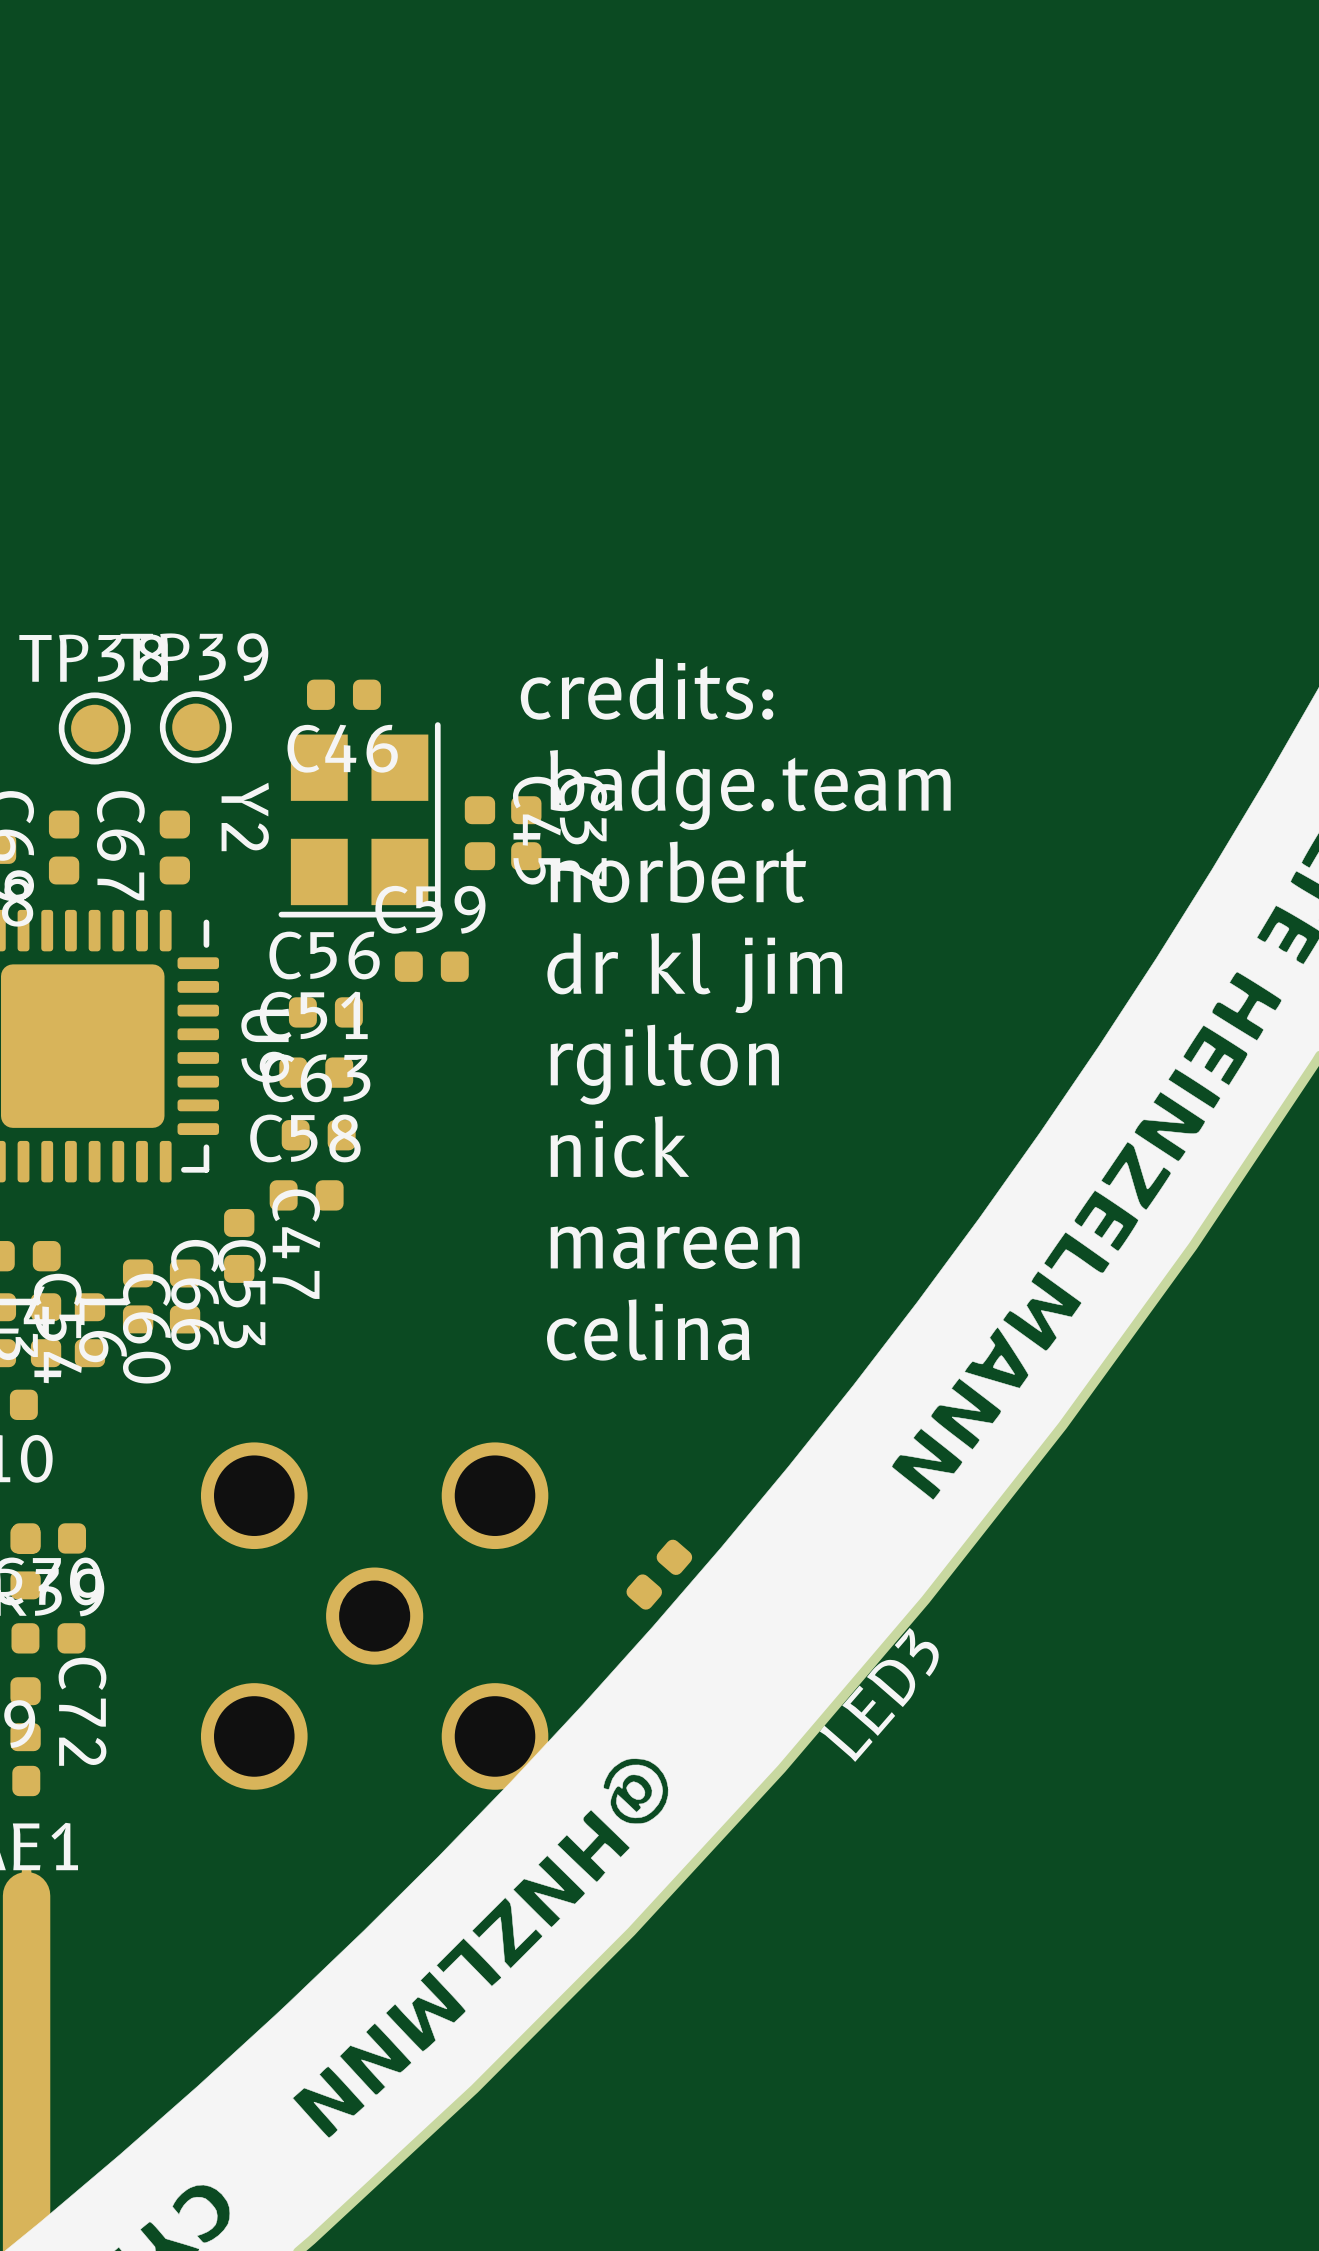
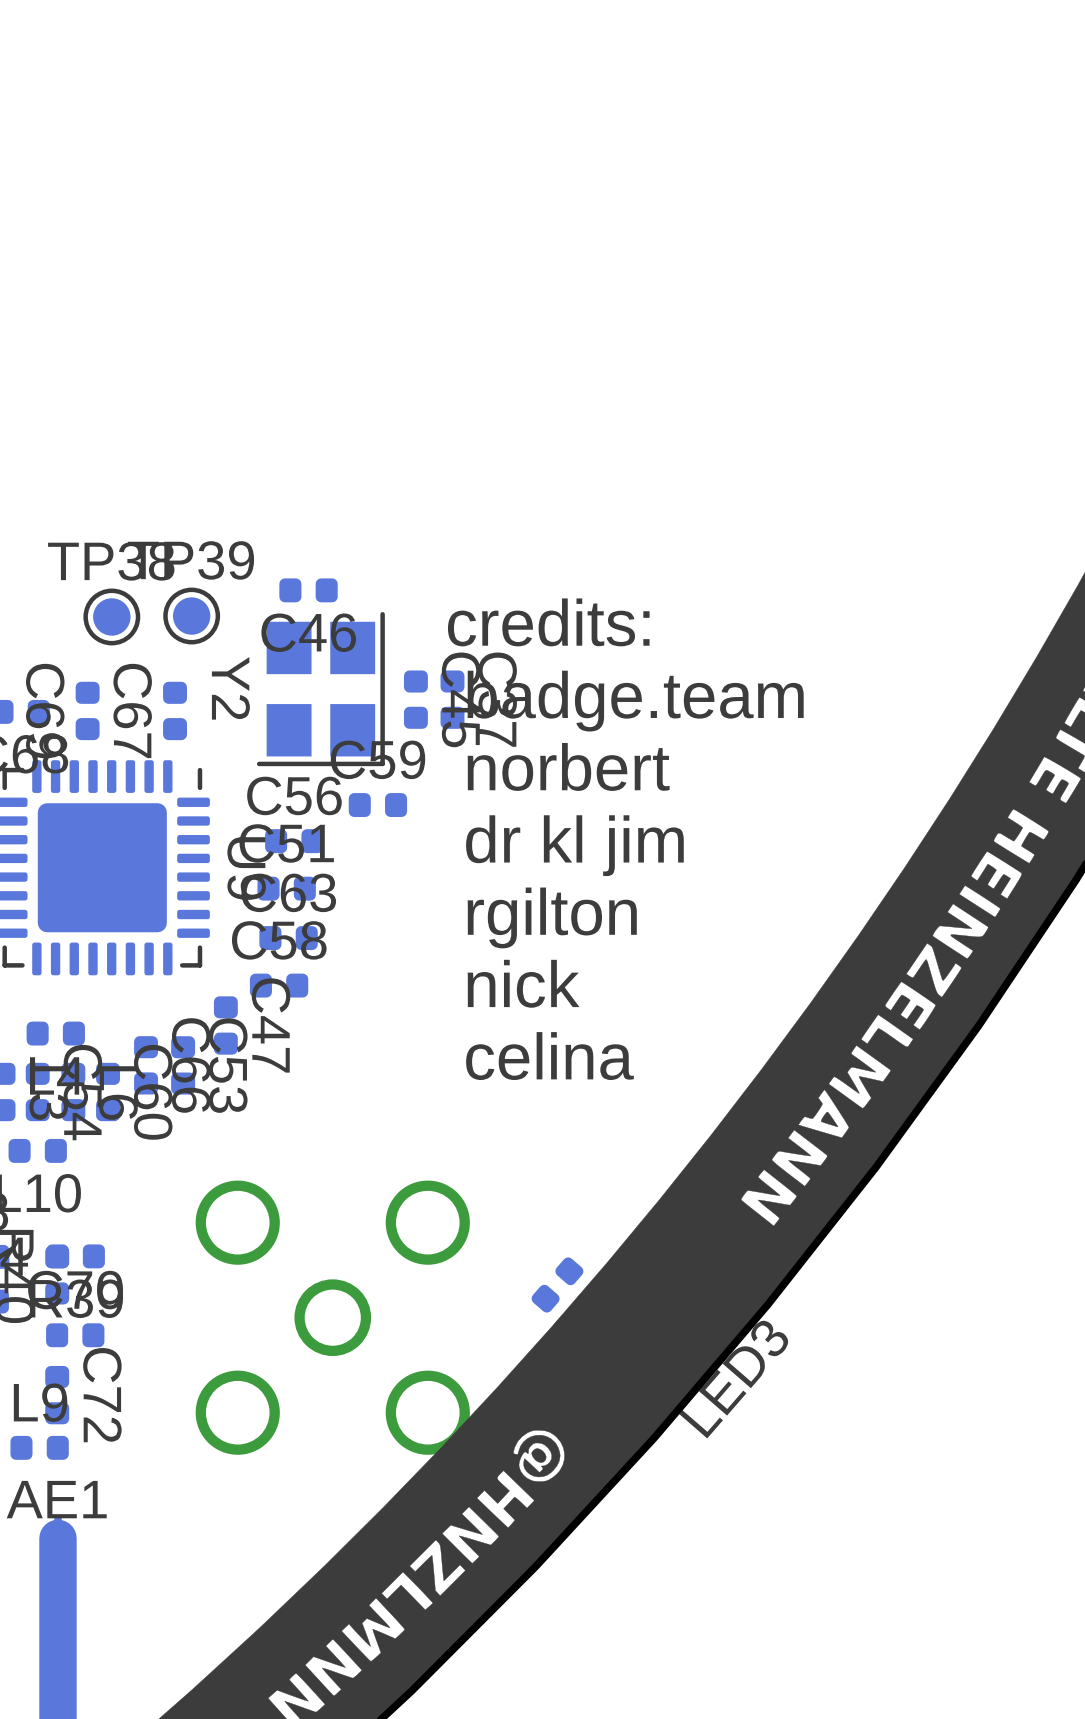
text position: credits: (647, 689) -> credits: (548, 622)
text position: badge.team (750, 790) -> badge.team (635, 701)
text position: norbert (678, 872) -> norbert (568, 766)
text position: dr kl jim (694, 973) -> dr kl jim (574, 845)
text position: rgilton (664, 1064) -> rgilton (552, 917)
text position: nick (619, 1146) -> nick (523, 983)
text: mareen (675, 1247) -> none
text position: celina (648, 1330) -> celina (549, 1056)

